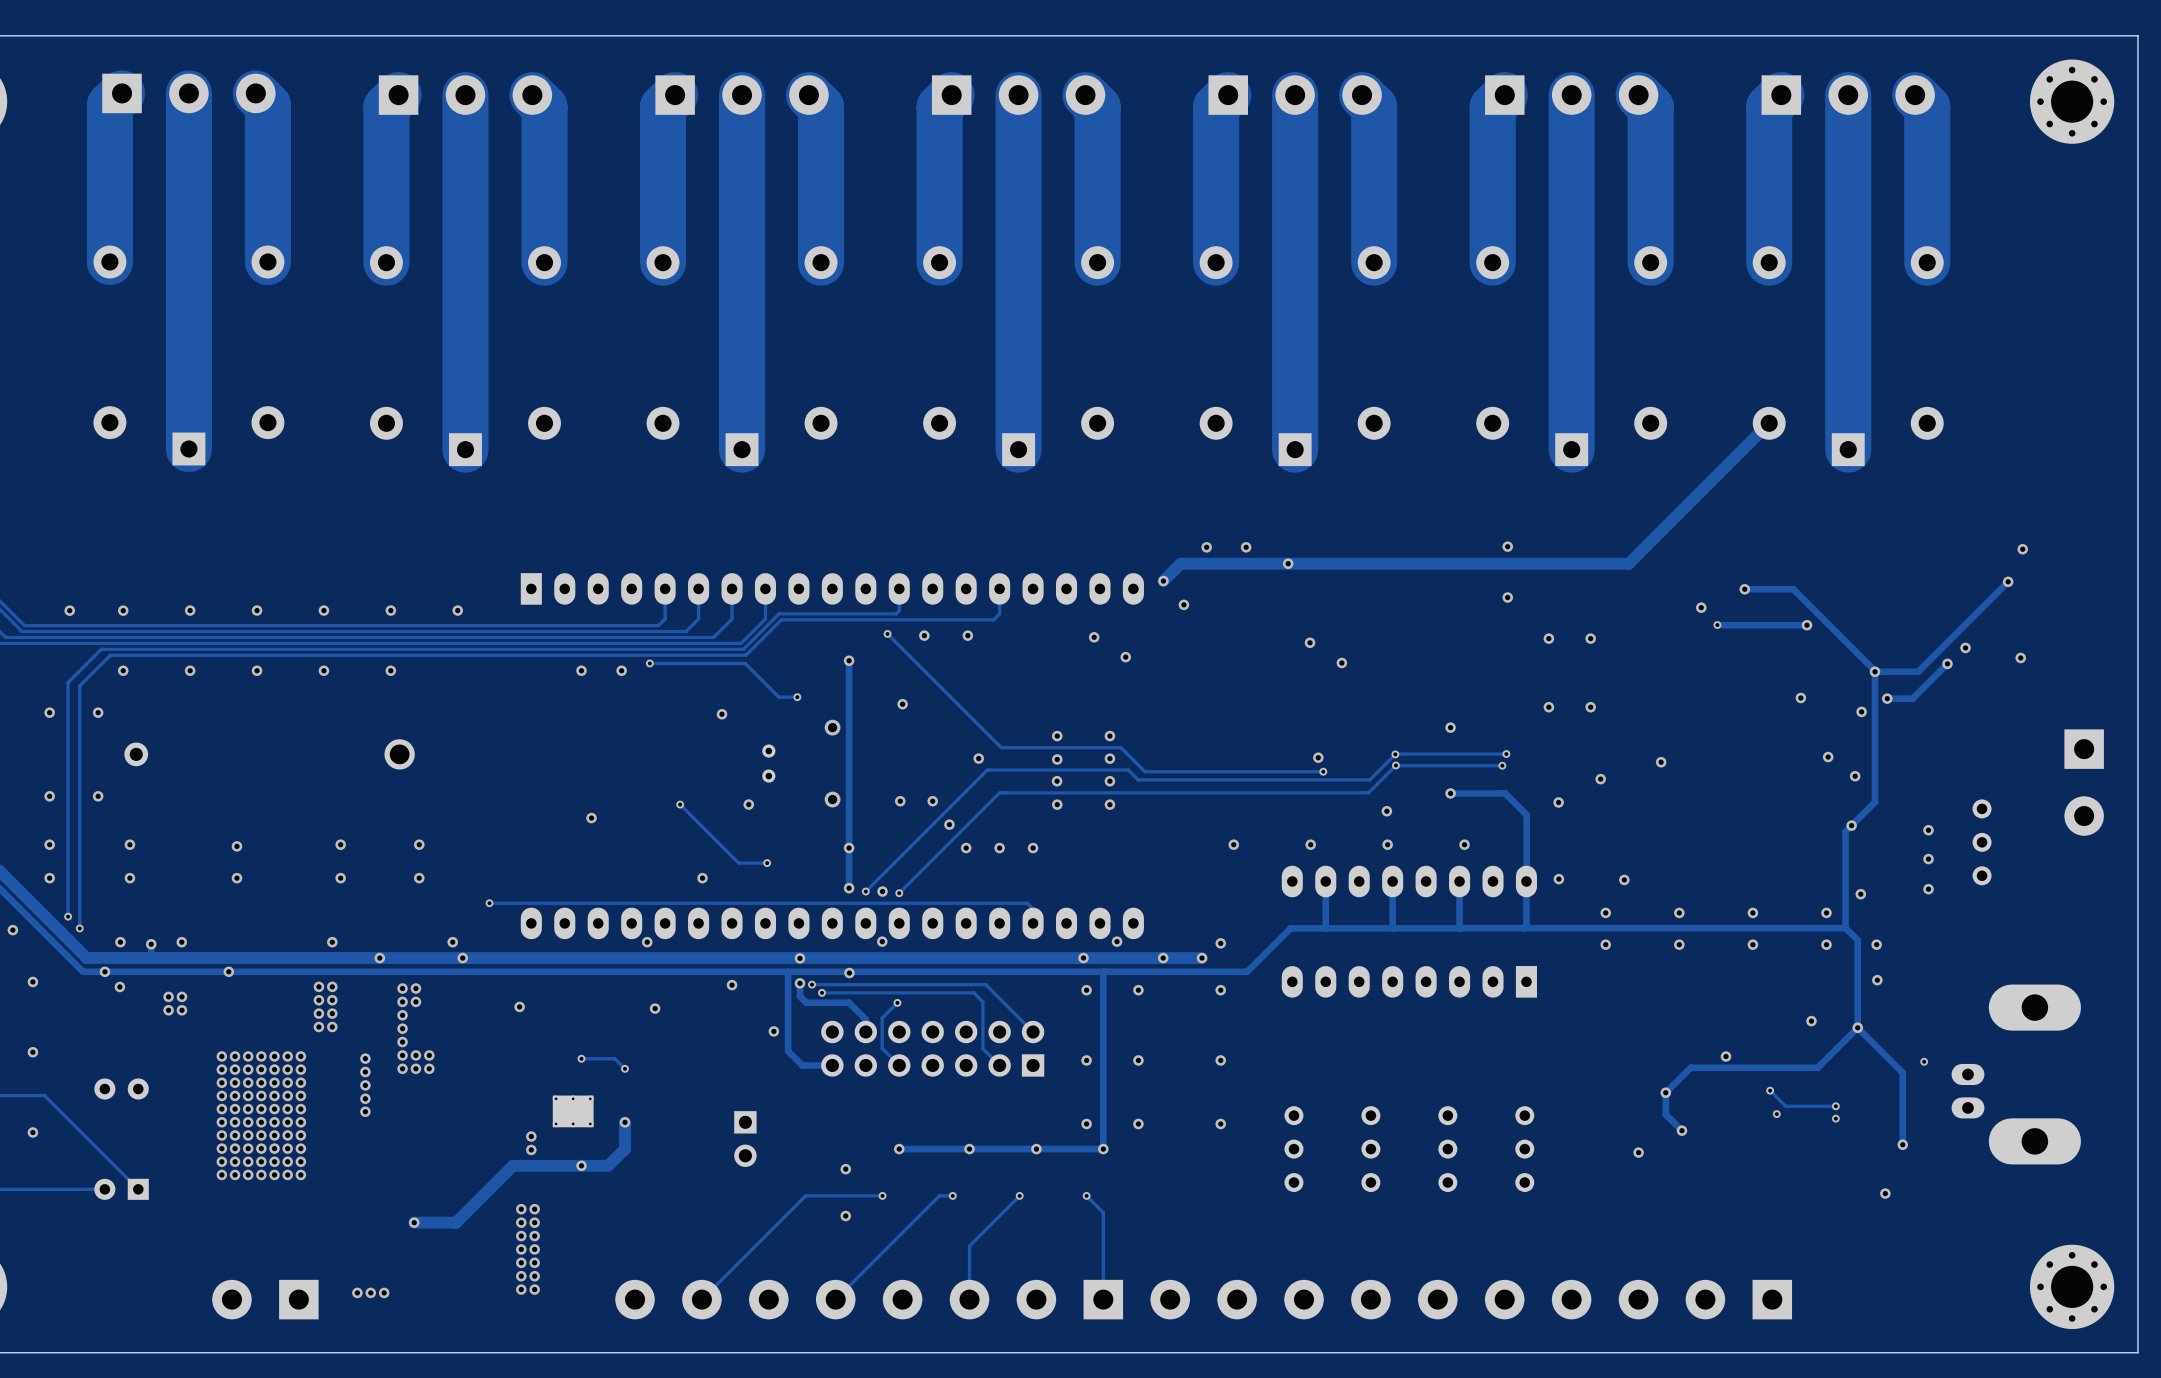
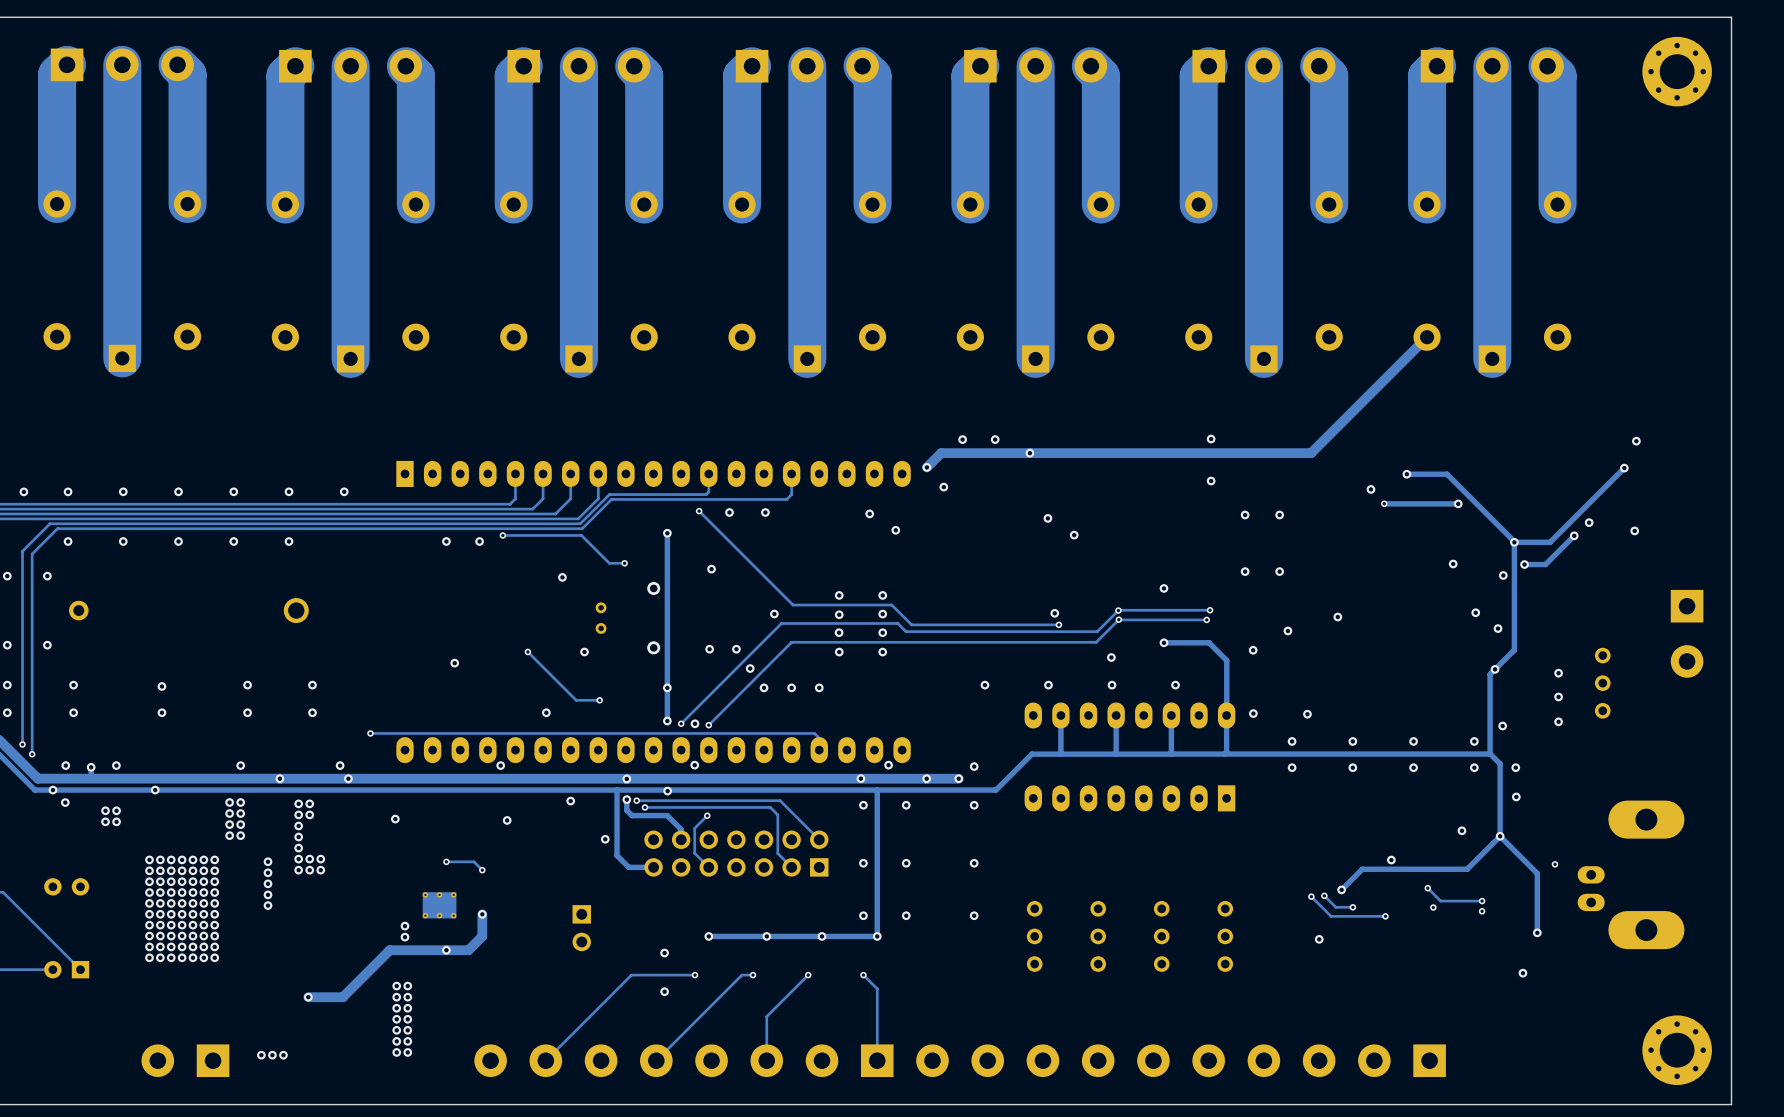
track: (1665, 1092) (1665, 1114) (1681, 1130) -> none
track: none -> (1324, 895) (1335, 907) (1352, 907)
via: none -> (1324, 895)
track: none -> (1311, 896) (1331, 916) (1385, 916)
via: none -> (1311, 896)
via: none -> (1352, 907)
via: none -> (1385, 916)
via: (1681, 1130) -> none

